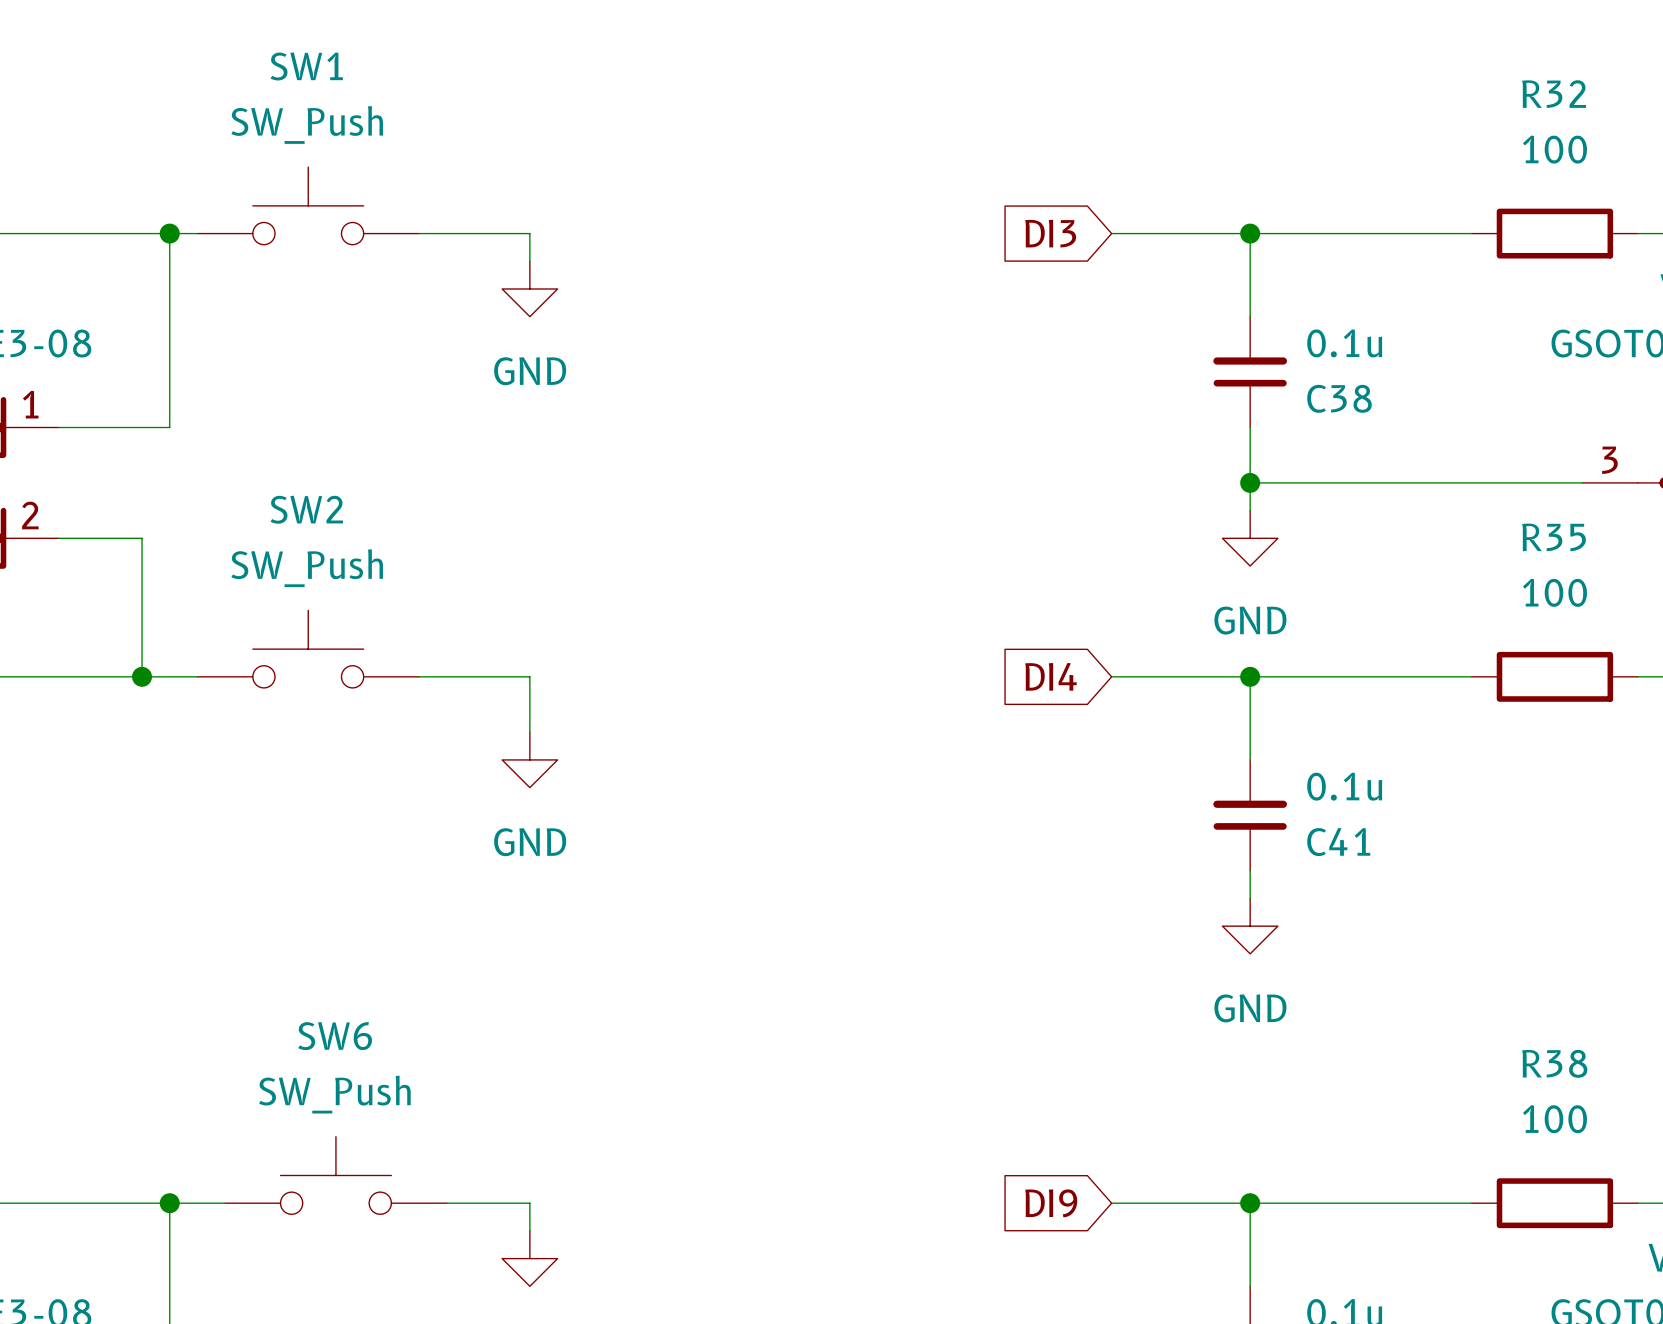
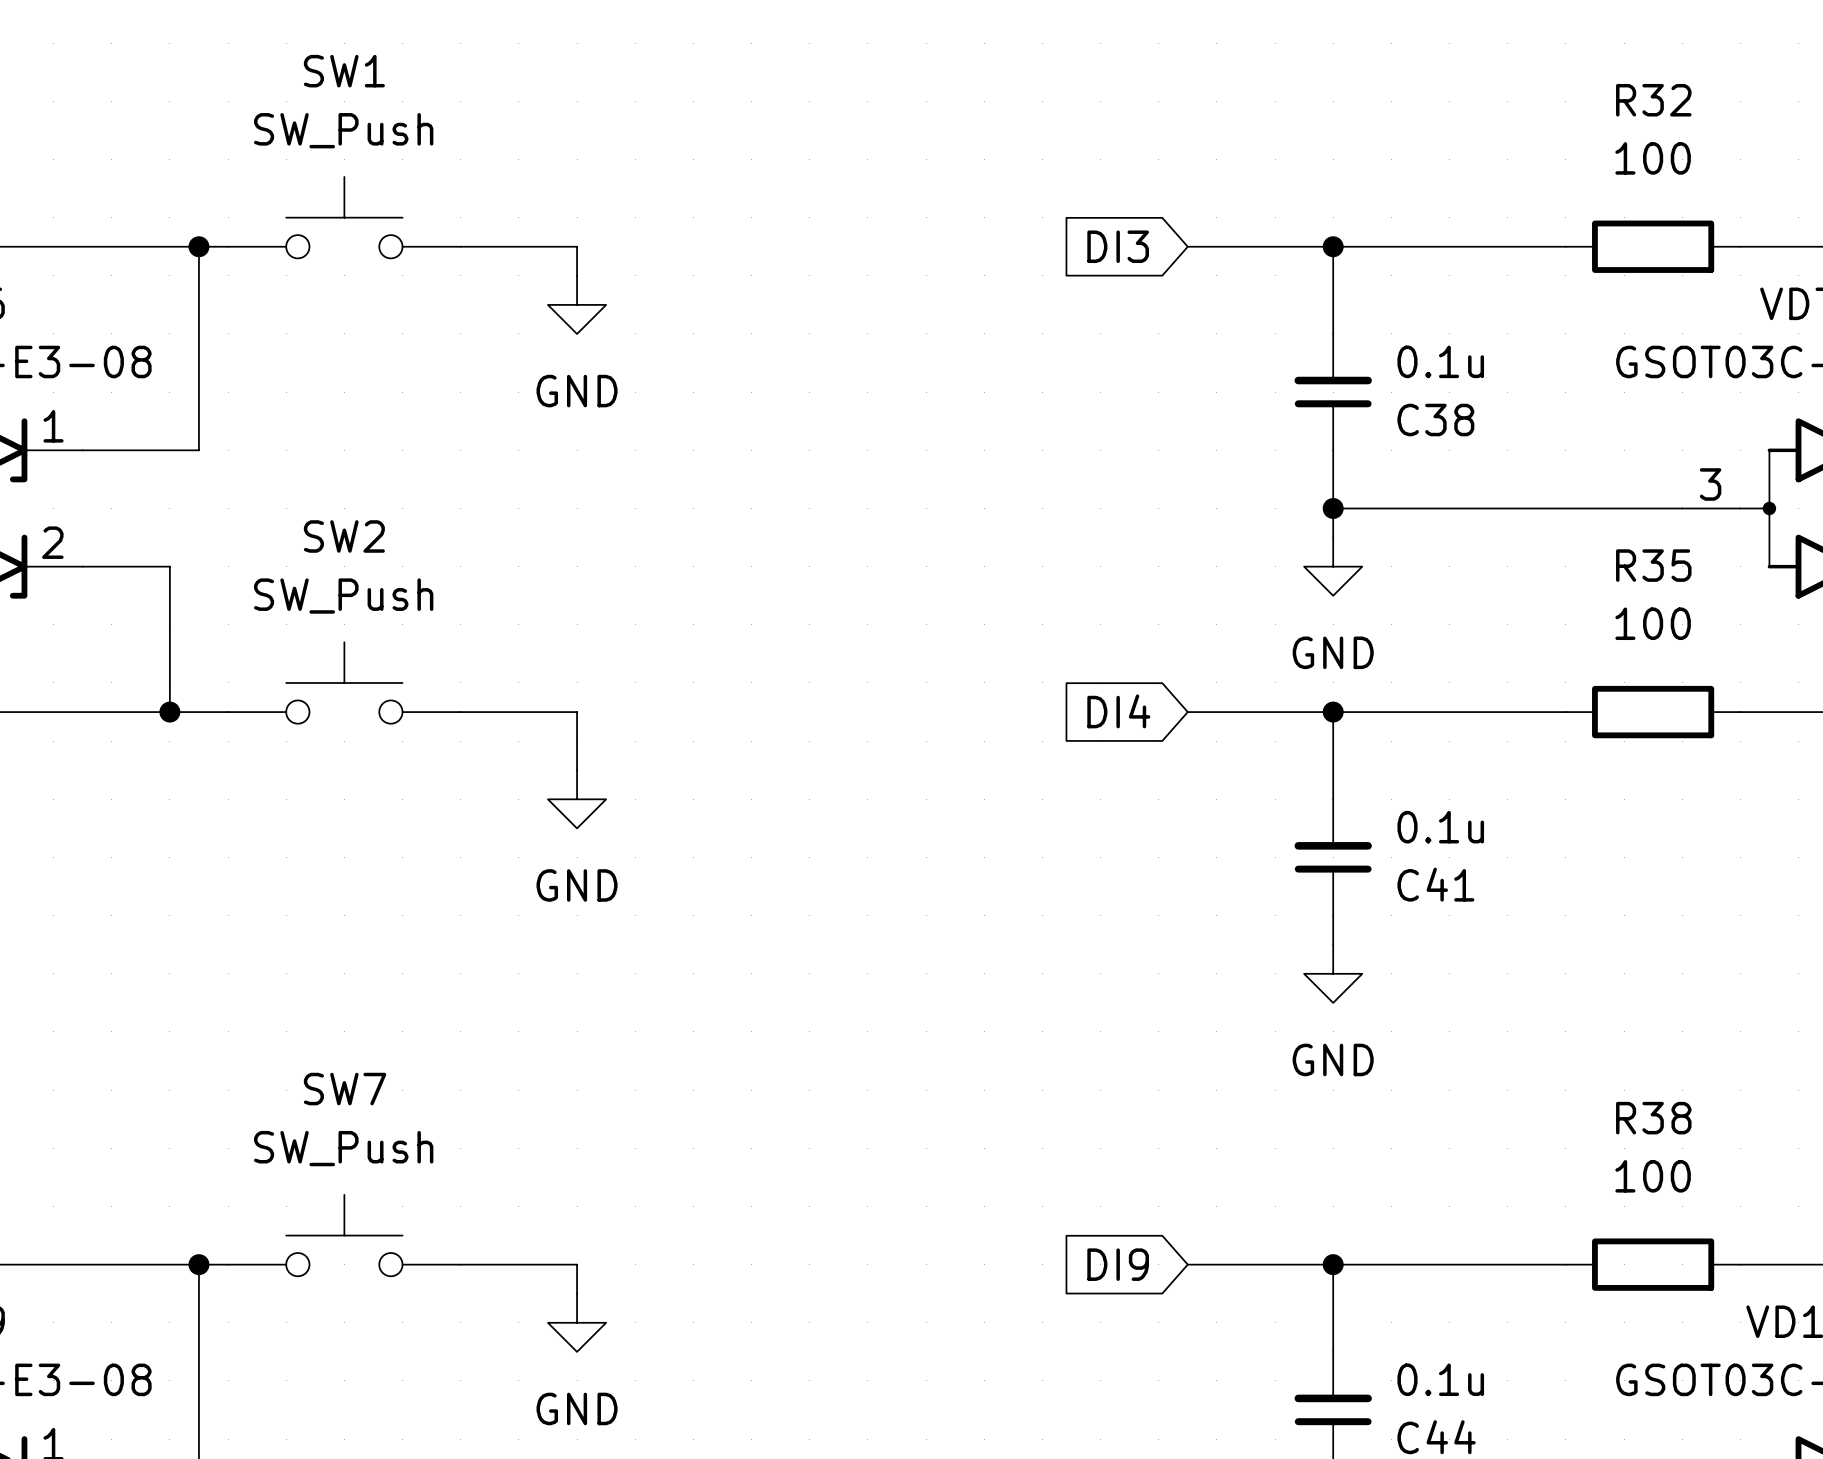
SW7: none -> SW_Push (344, 1235)
SW6: SW_Push (335, 1175) -> none

